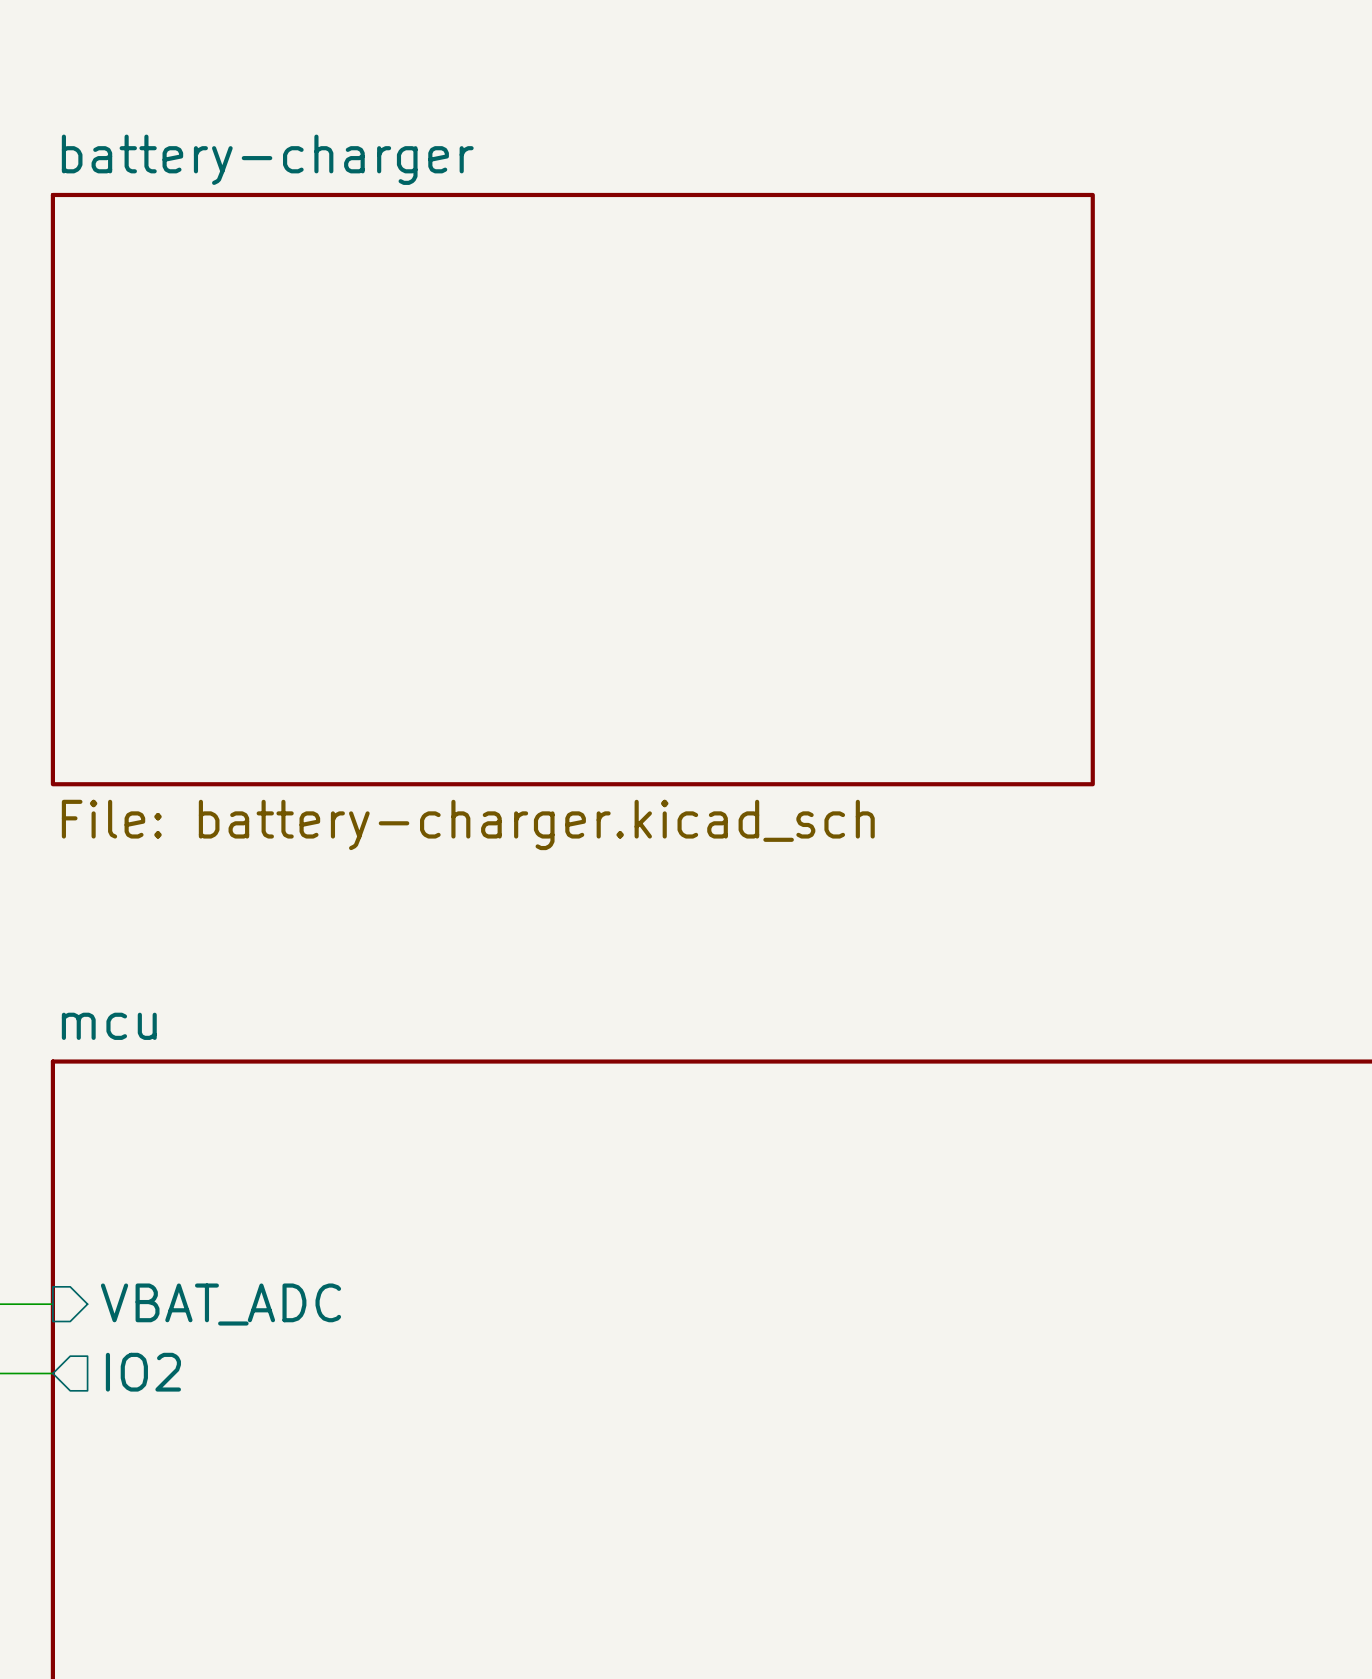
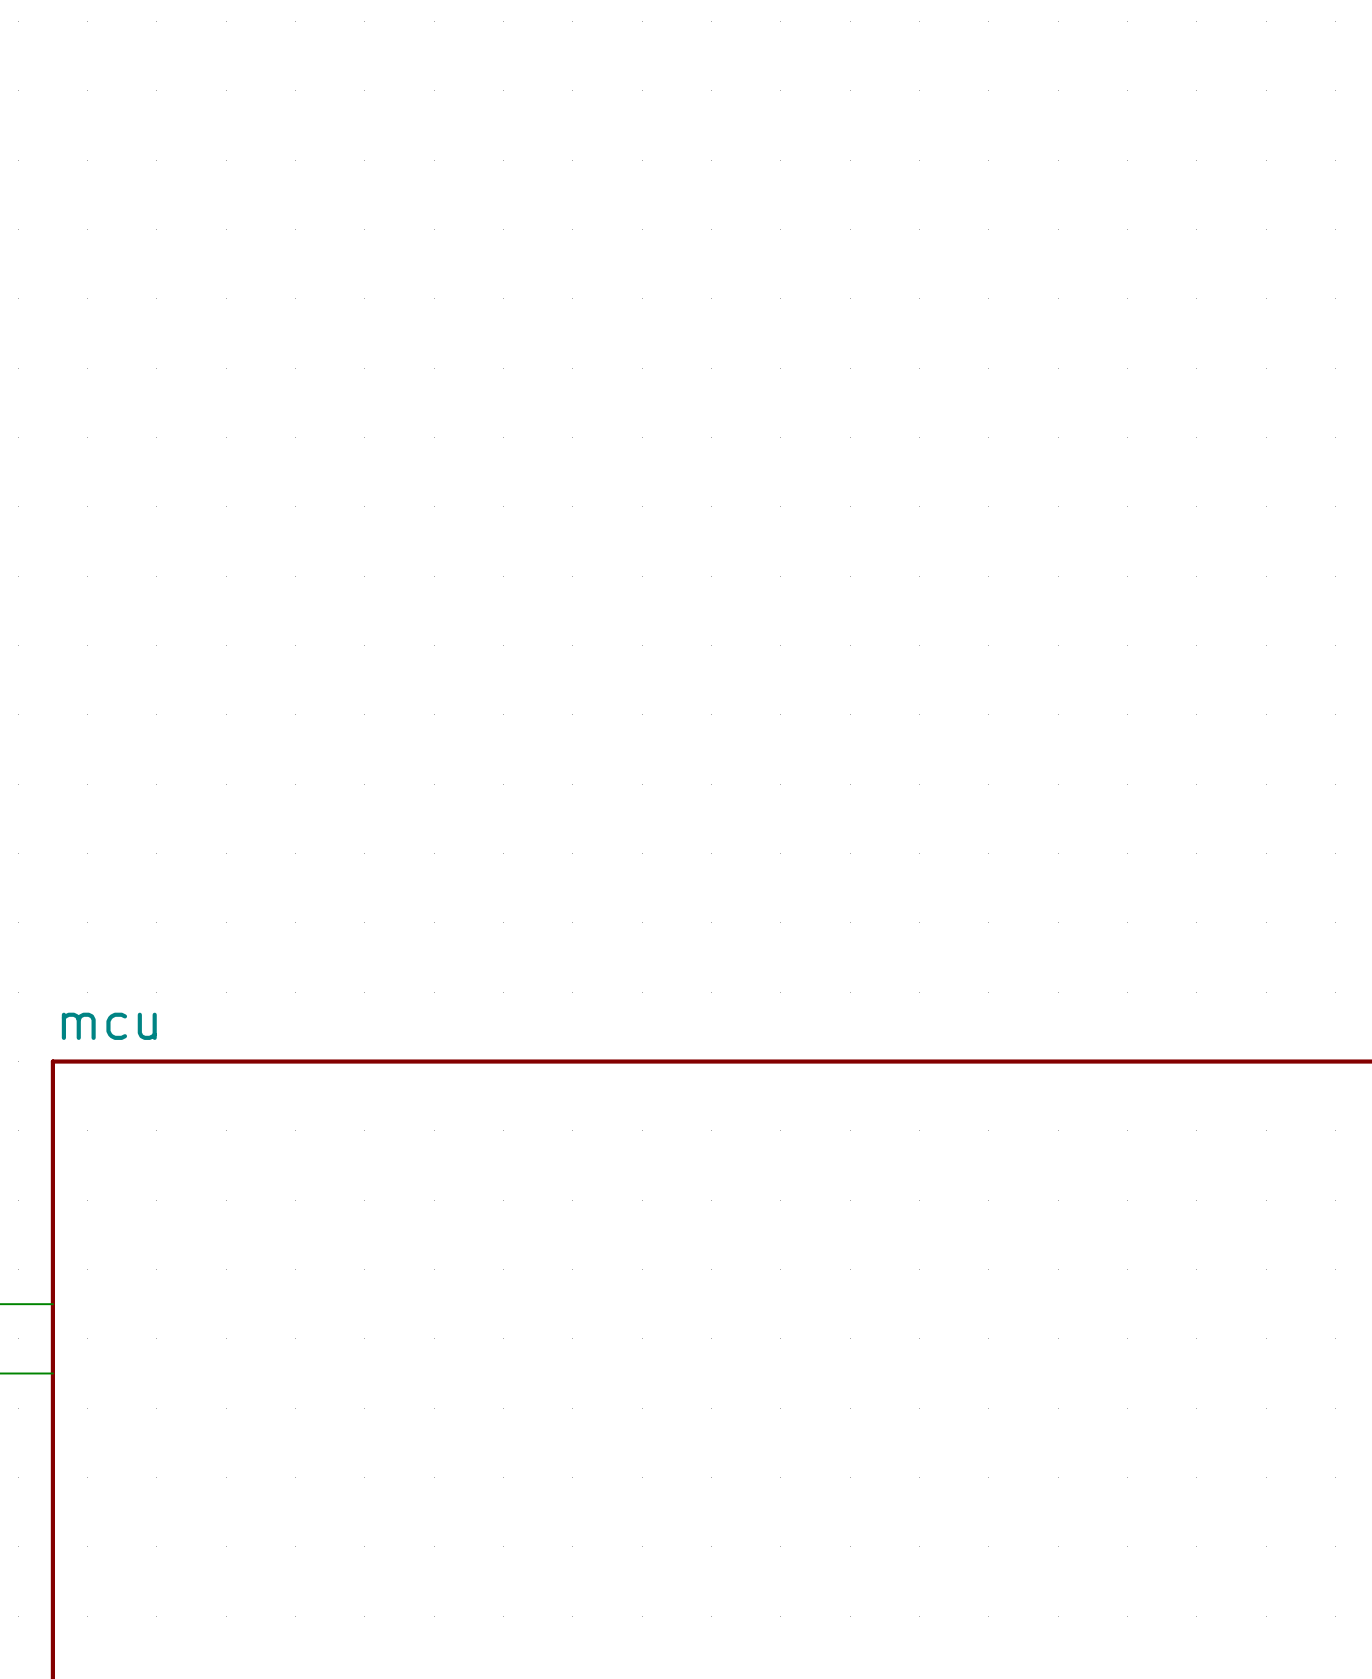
sheet battery-charger: File: battery-charger.kicad_sch (572, 489) -> none
sheet pin: VBAT_ADC (220, 1304) -> none
sheet pin: IO2 (143, 1372) -> none

